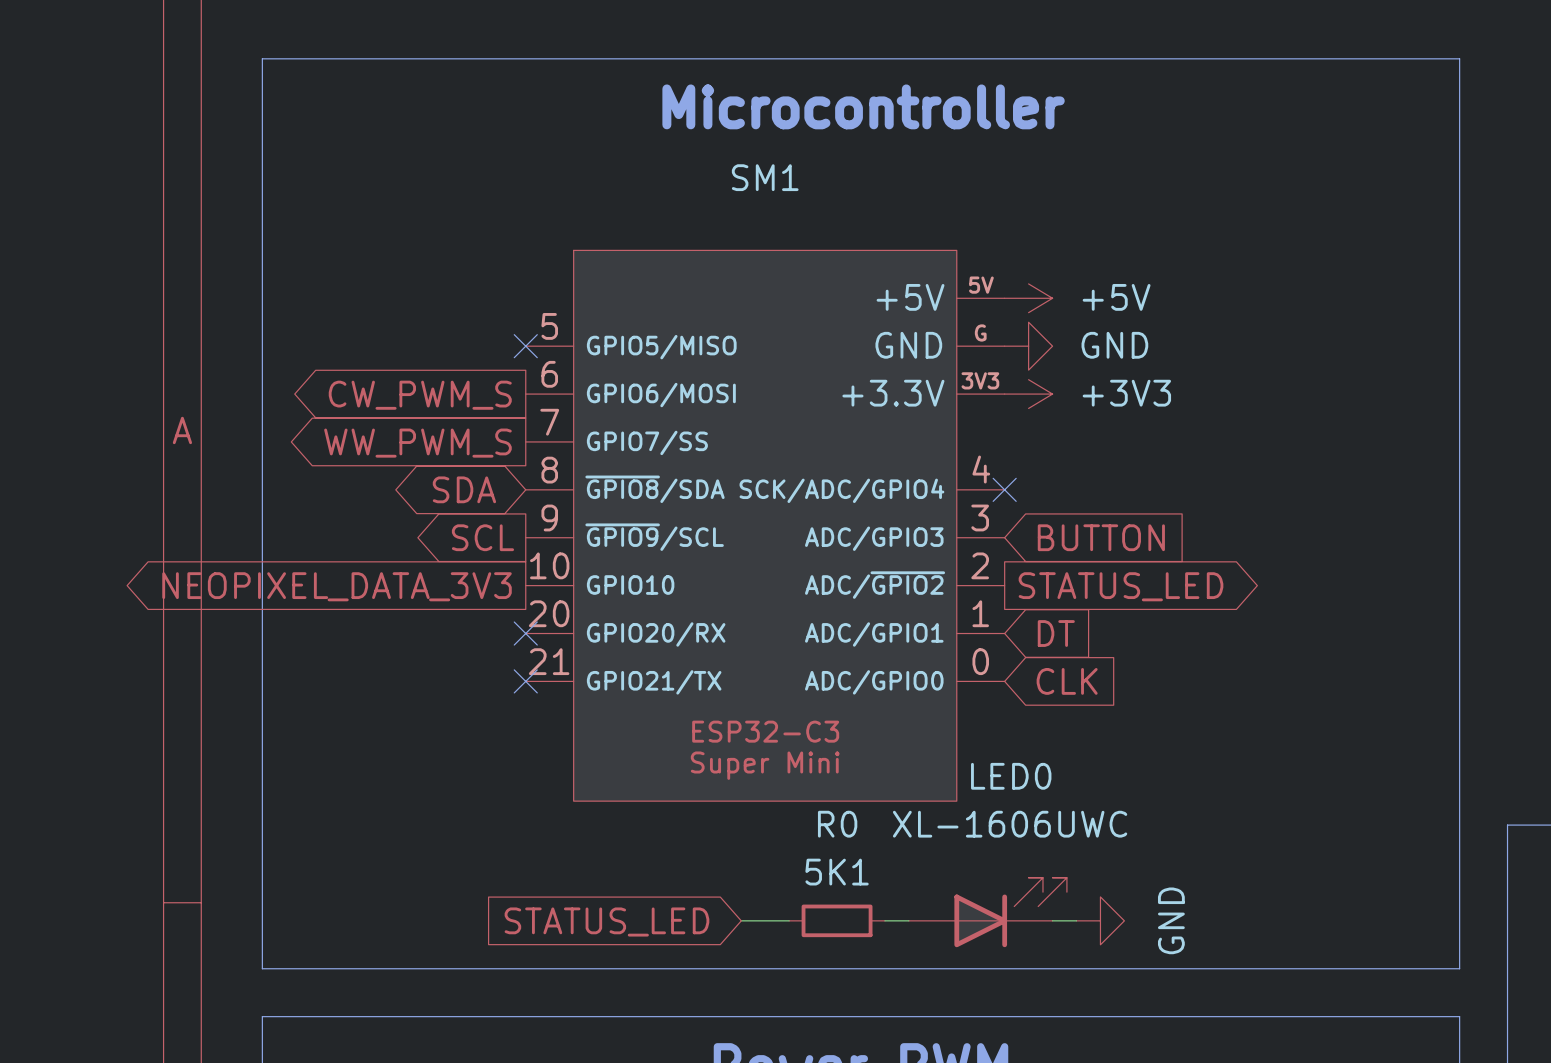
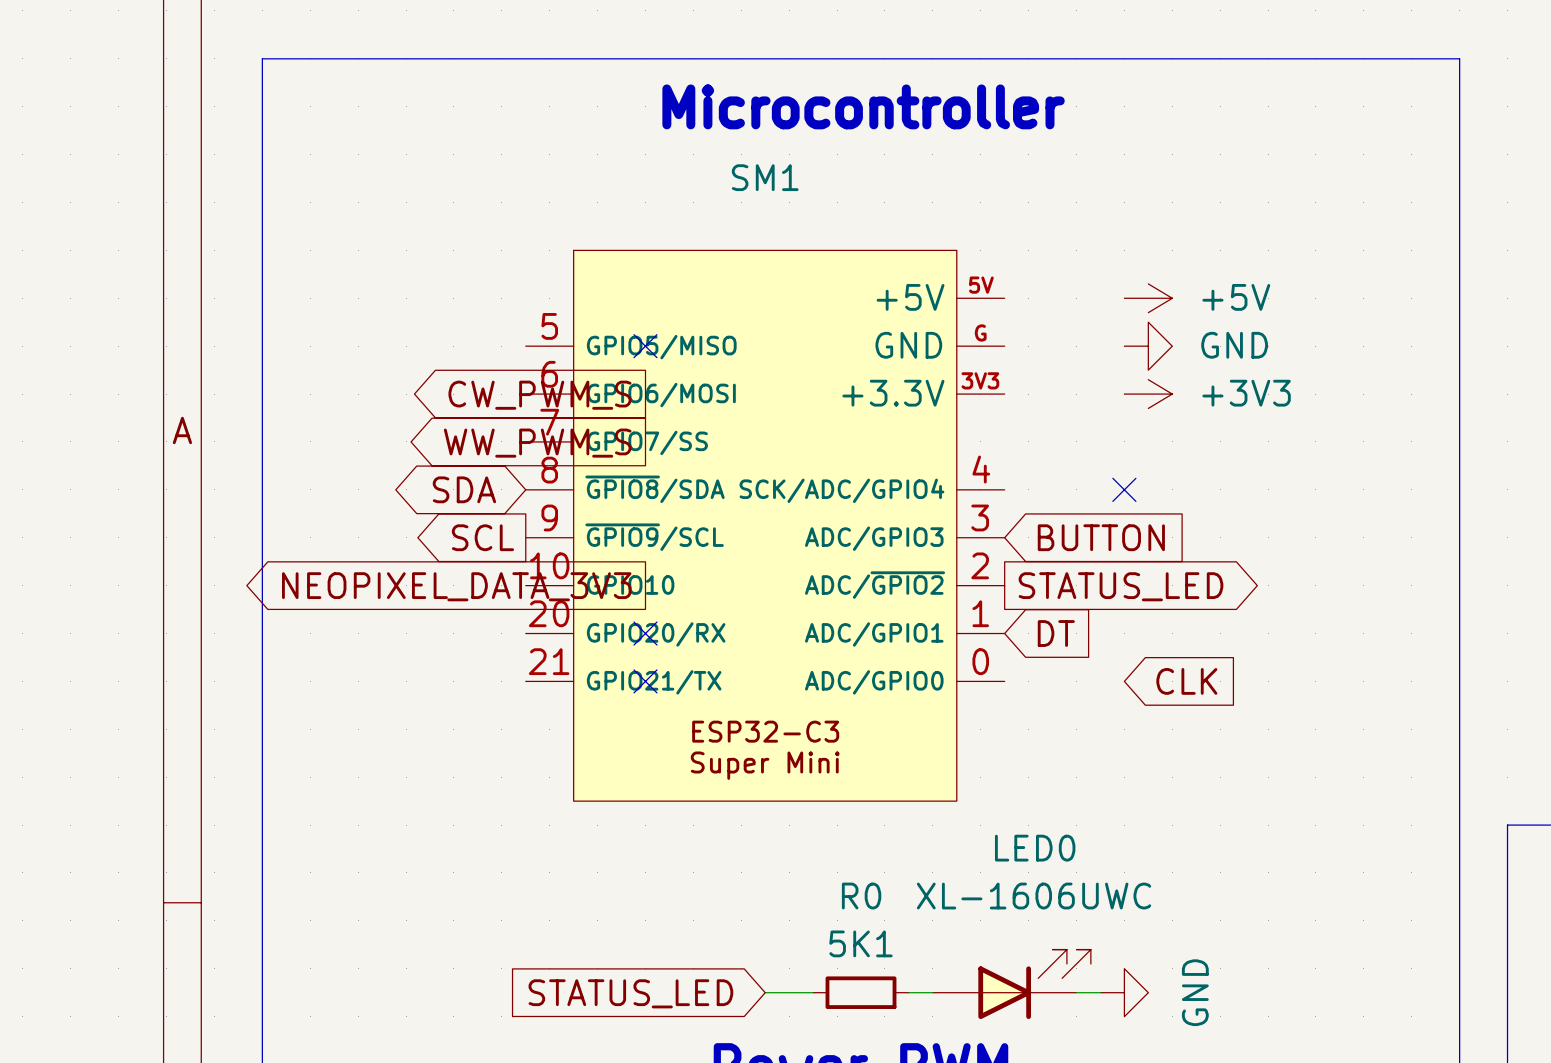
power symbol position: +5V (1028, 298) -> +5V (1148, 298)
no-connect mark: (525, 346) -> none
no-connect mark: none -> (645, 346)
power symbol position: GND (1028, 346) -> GND (1148, 346)
power symbol position: +3V3 (1028, 394) -> +3V3 (1148, 394)
global label position: CW_PWM_S (420, 395) -> CW_PWM_S (539, 395)
global label position: WW_PWM_S (417, 443) -> WW_PWM_S (537, 443)
no-connect mark: (1004, 489) -> none
no-connect mark: none -> (1124, 489)
global label position: NEOPIXEL_DATA_3V3 (337, 586) -> NEOPIXEL_DATA_3V3 (456, 586)
no-connect mark: (525, 633) -> none
no-connect mark: none -> (645, 633)
no-connect mark: (525, 681) -> none
no-connect mark: none -> (645, 681)
global label position: CLK (1067, 681) -> CLK (1186, 681)
LED0 position: (987, 912) -> (1011, 984)
wire: (741, 920) (789, 920) -> (765, 992) (813, 992)
R0 position: (837, 920) -> (861, 992)
wire: (884, 920) (908, 920) -> (908, 992) (932, 992)
wire: (1052, 920) (1076, 920) -> (1076, 992) (1100, 992)
power symbol position: GND (1100, 920) -> GND (1124, 992)
global label position: STATUS_LED (606, 922) -> STATUS_LED (630, 993)
line: (262, 968) (1459, 968) -> (262, 968) (262, 1016)
line: (262, 1016) (1459, 1016) -> (1459, 968) (1459, 1016)

